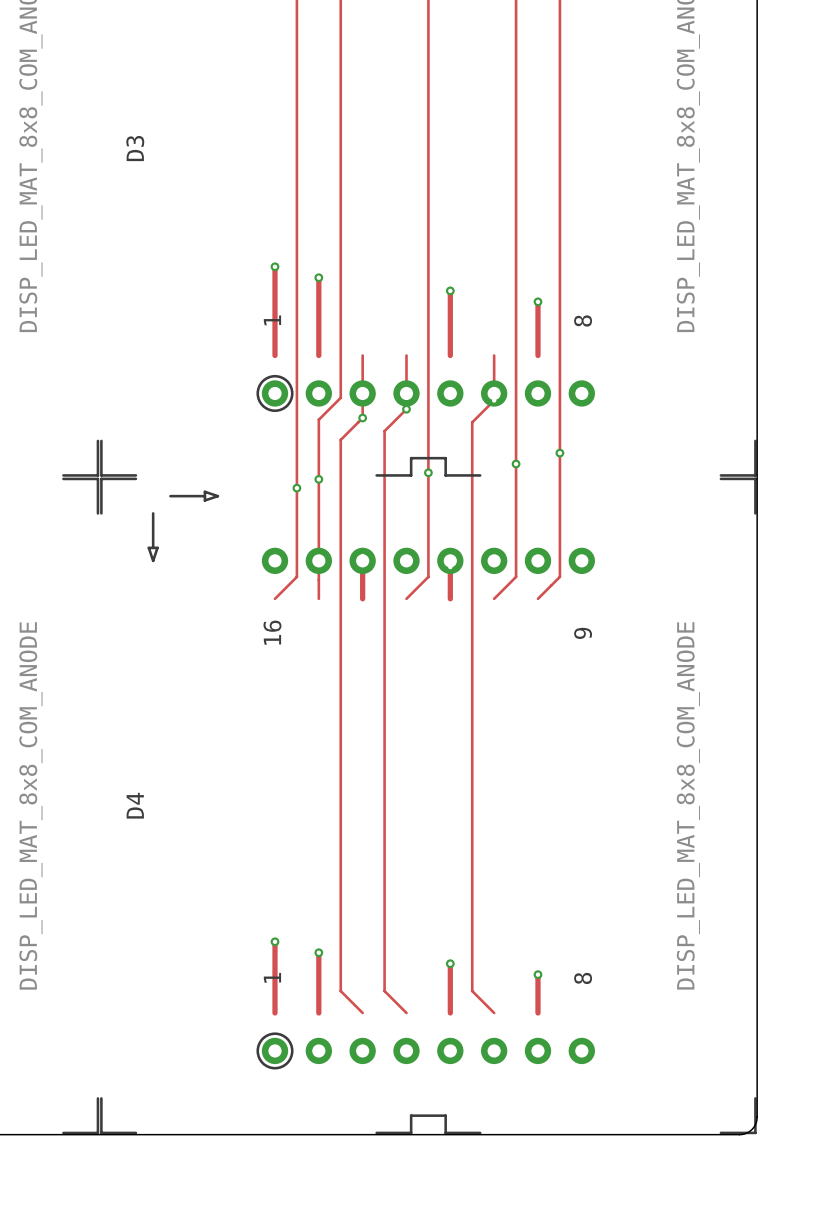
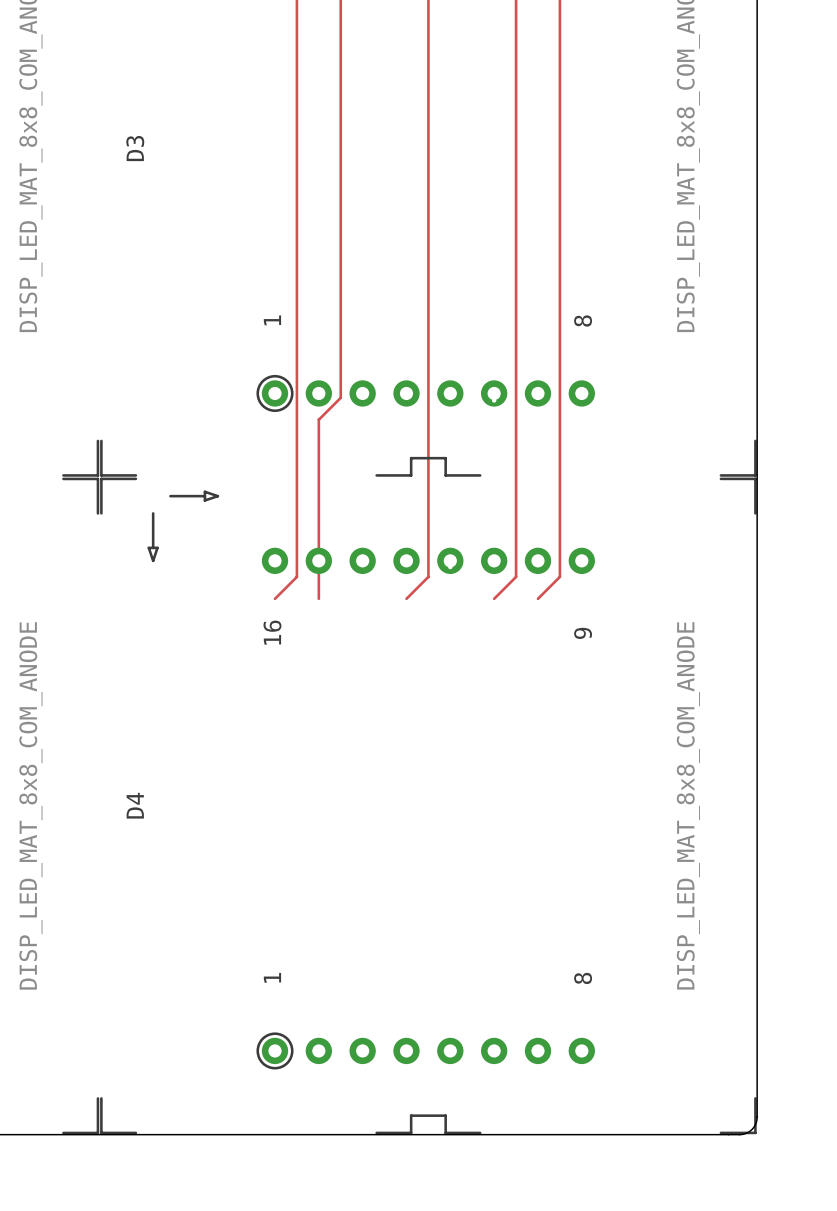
track: (274, 266) (274, 355) -> none
via: (274, 266) -> none
track: (318, 277) (318, 355) -> none
via: (318, 277) -> none
track: (450, 290) (450, 355) -> none
via: (450, 290) -> none
track: (537, 301) (537, 355) -> none
via: (537, 301) -> none
track: (362, 355) (362, 417) (340, 439) (340, 991) (362, 1012) -> none
track: (406, 355) (406, 409) (384, 431) (384, 991) (406, 1012) -> none
track: (494, 355) (494, 400) (472, 422) (472, 991) (494, 1012) -> none
via: (406, 409) -> none
via: (362, 417) -> none
via: (559, 453) -> none
via: (516, 464) -> none
via: (428, 472) -> none
via: (318, 479) -> none
via: (296, 488) -> none
track: (362, 556) (362, 598) -> none
track: (450, 567) (450, 598) -> none
track: (274, 941) (274, 1012) -> none
via: (274, 941) -> none
track: (318, 952) (318, 1012) -> none
via: (318, 952) -> none
track: (450, 963) (450, 1012) -> none
via: (450, 963) -> none
track: (537, 974) (537, 1012) -> none
via: (537, 974) -> none

